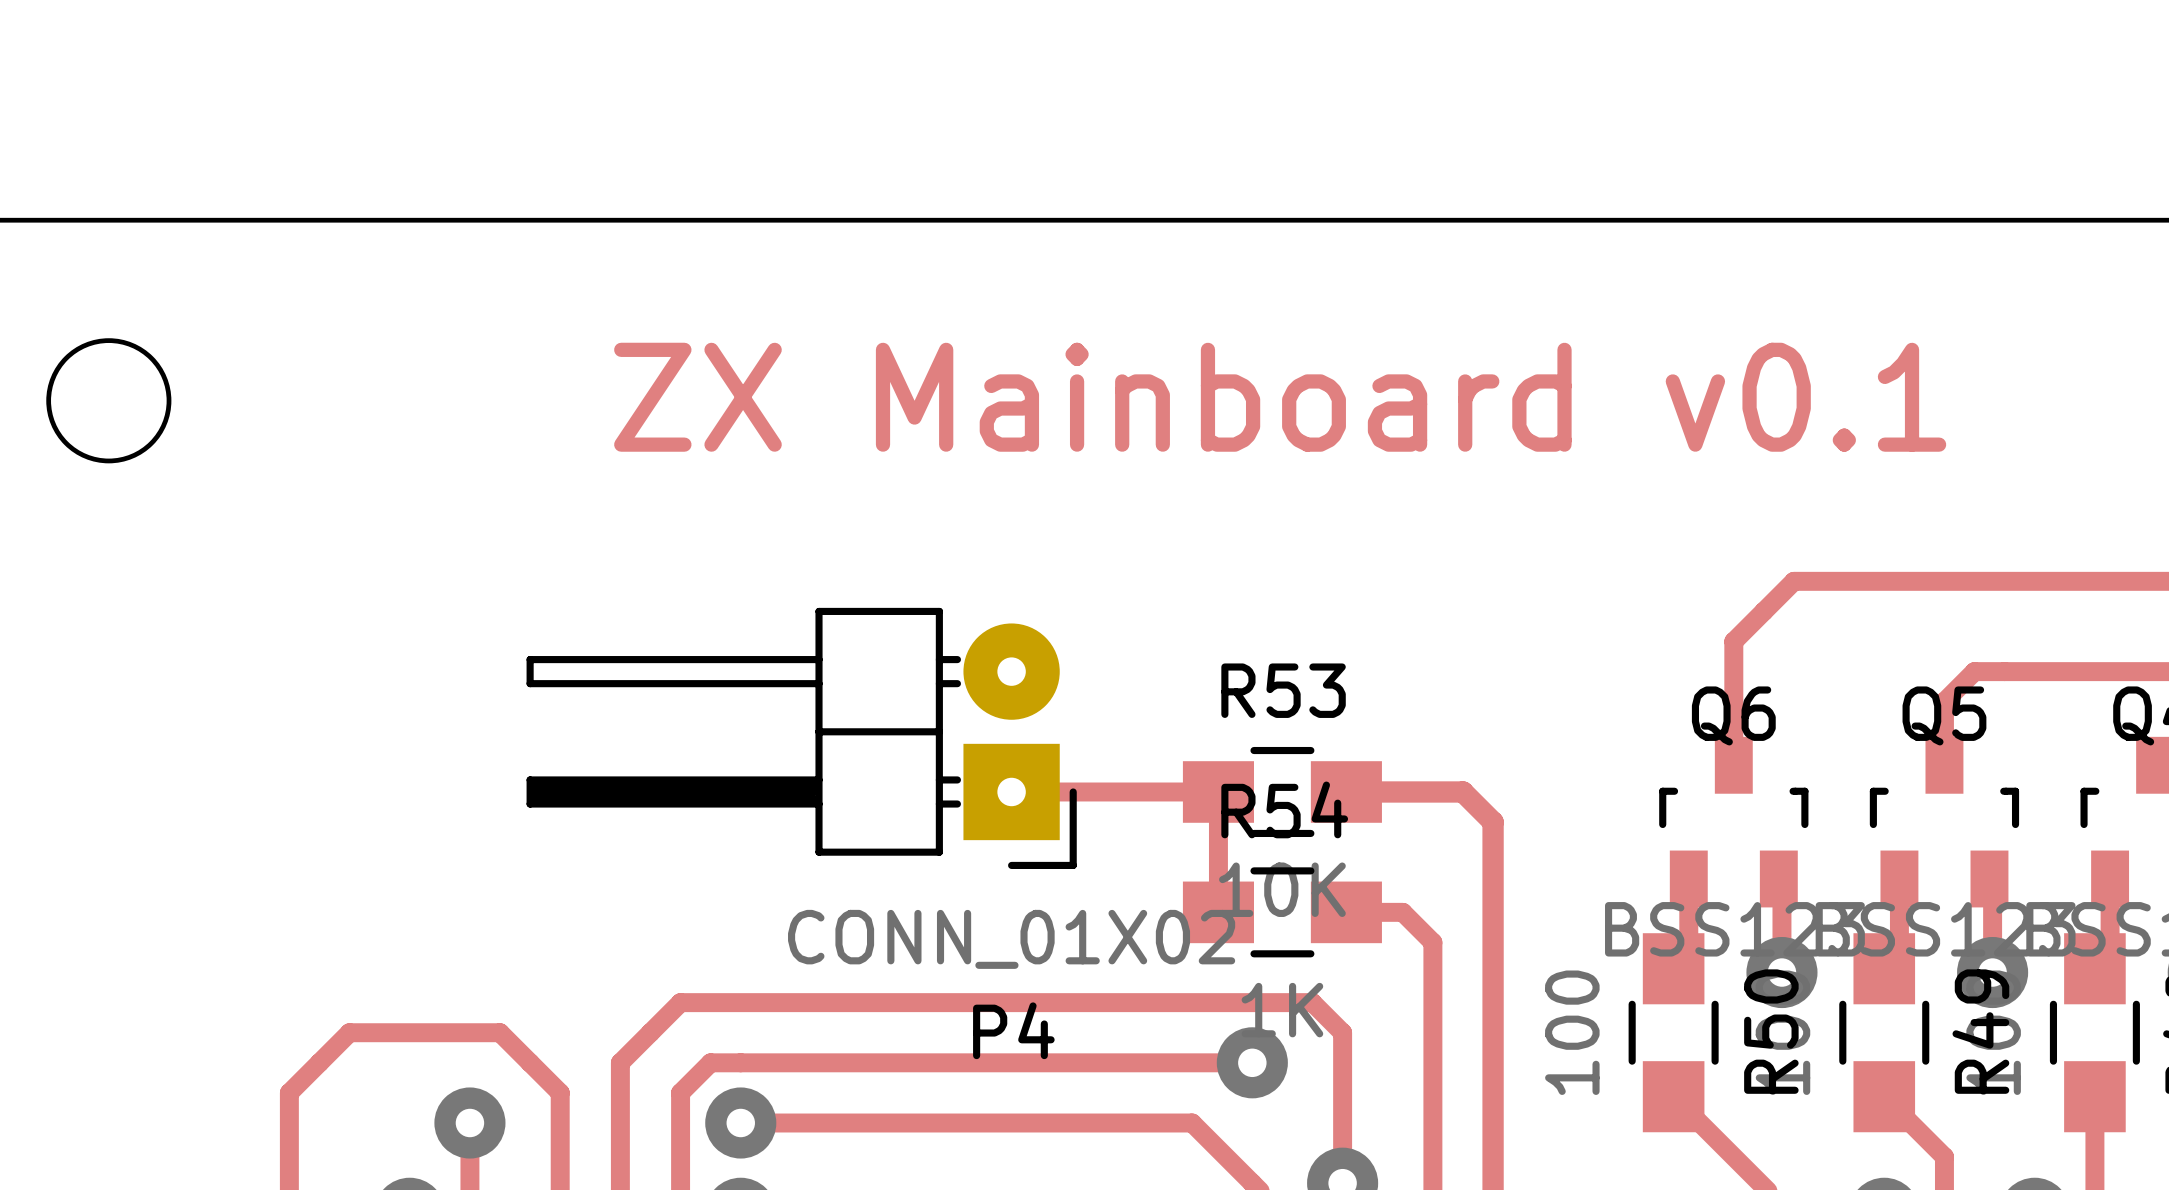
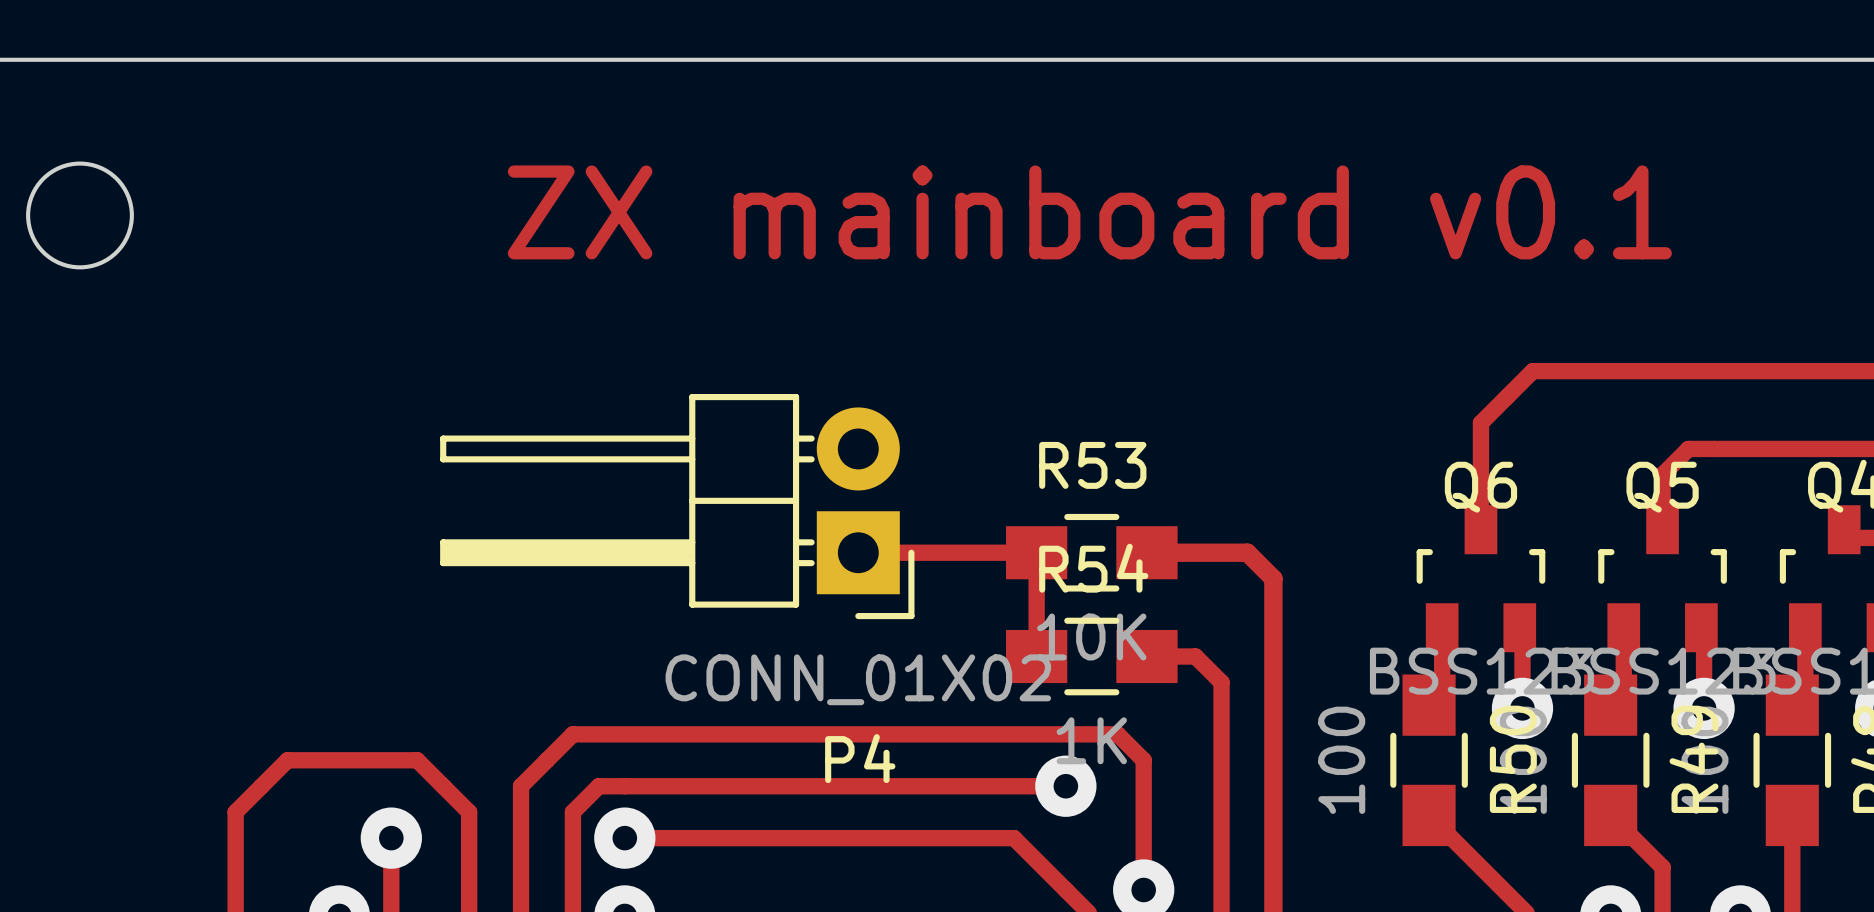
text: ZX Mainboard v0.1 (1280, 397) -> ZX mainboard v0.1 (1089, 212)
P4 footprint: [526, 607, 1077, 869] -> [440, 394, 915, 620]

